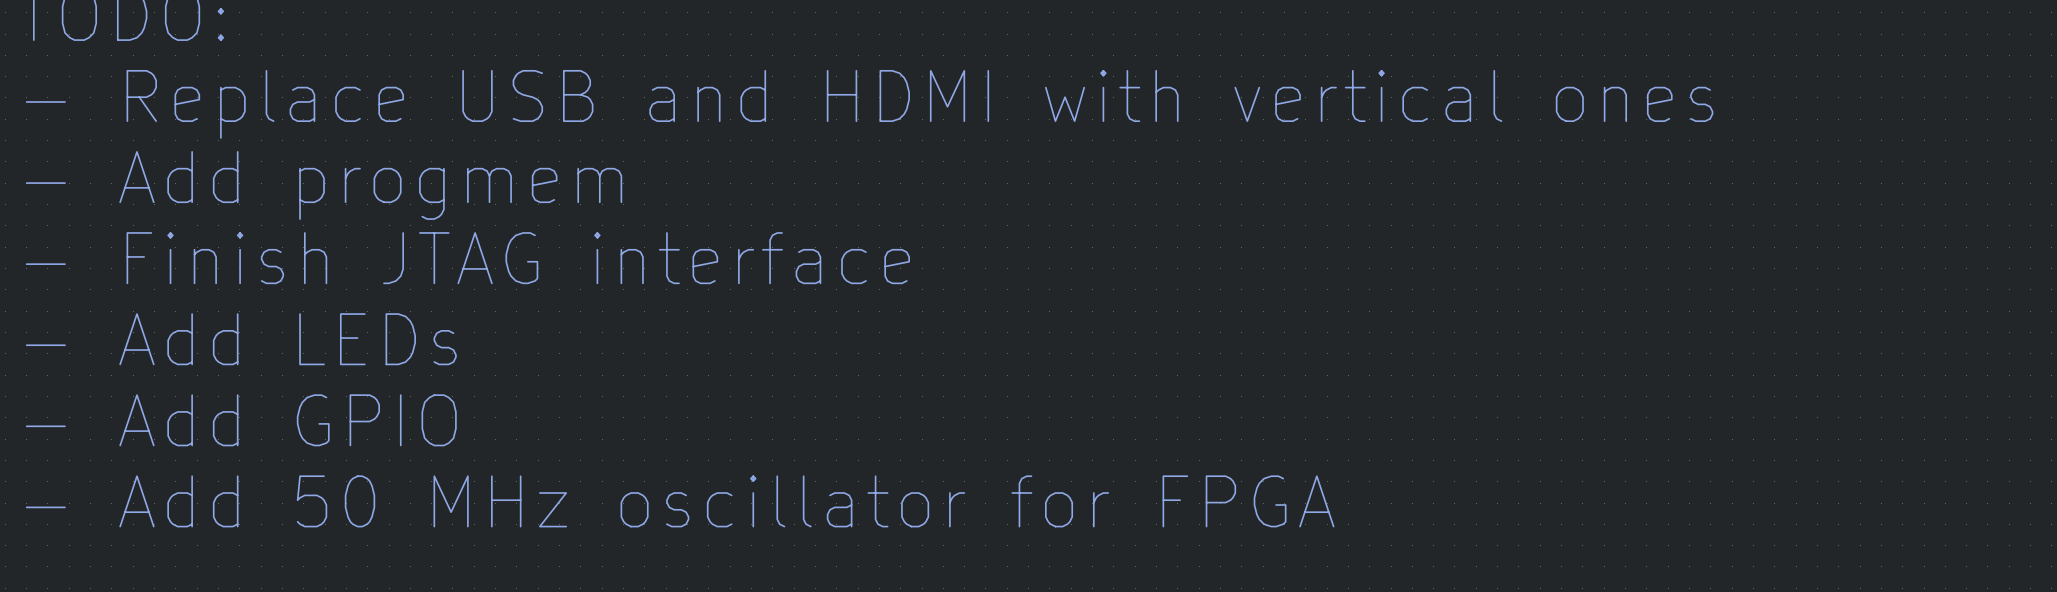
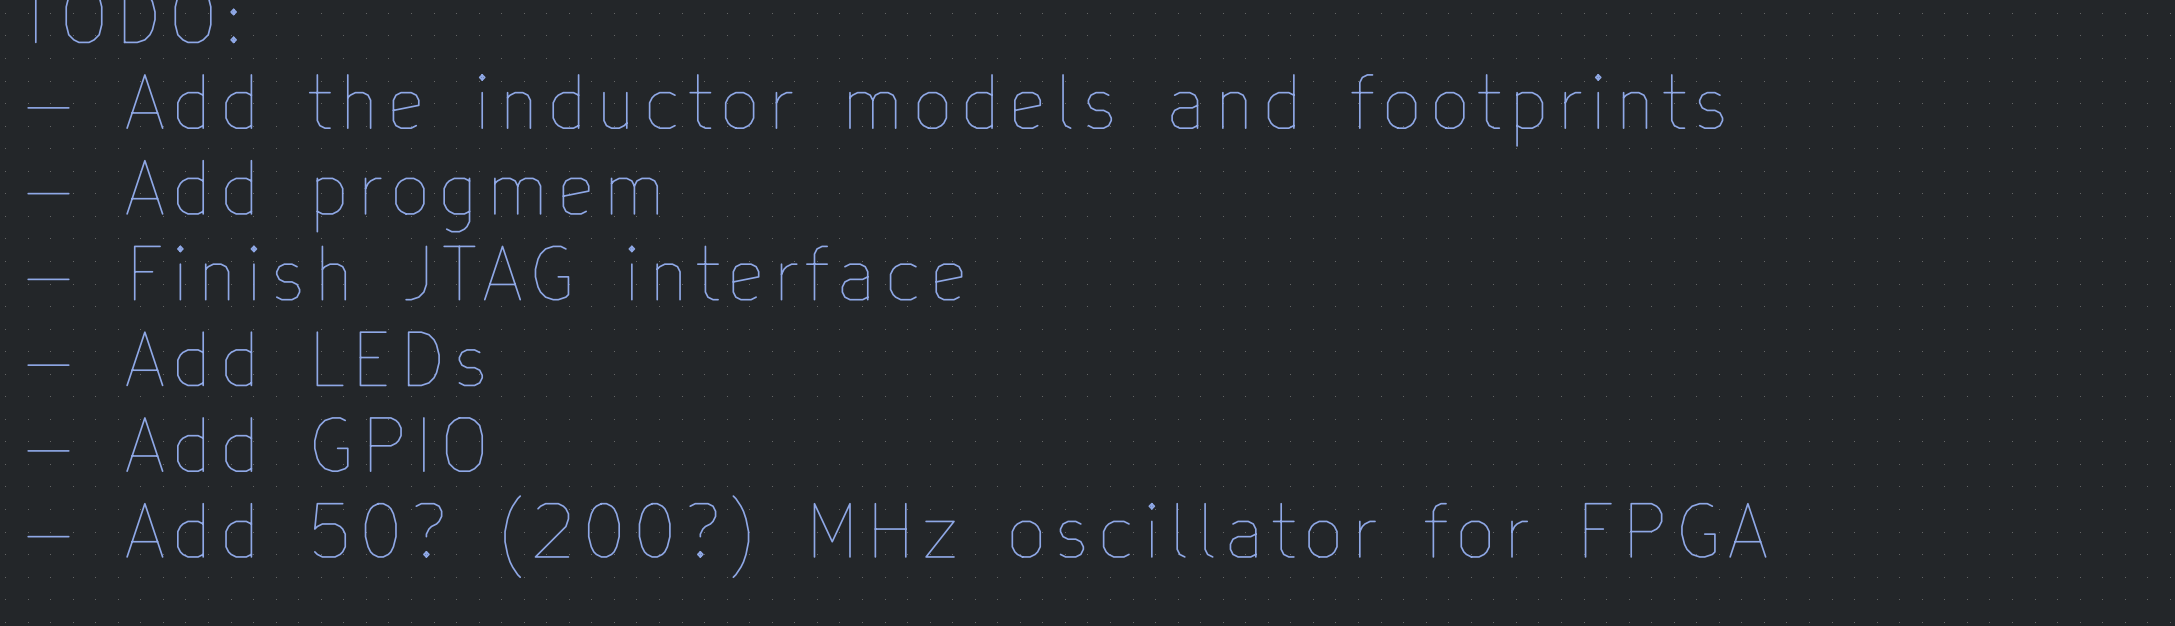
text: - Replace USB and HDMI with vertical ones (869, 104) -> - Add the inductor models and footprints (875, 110)
text: - Add 50 MHz oscillator for FPGA (680, 501) -> - Add 50? (200?) MHz oscillator for FPGA (896, 536)

